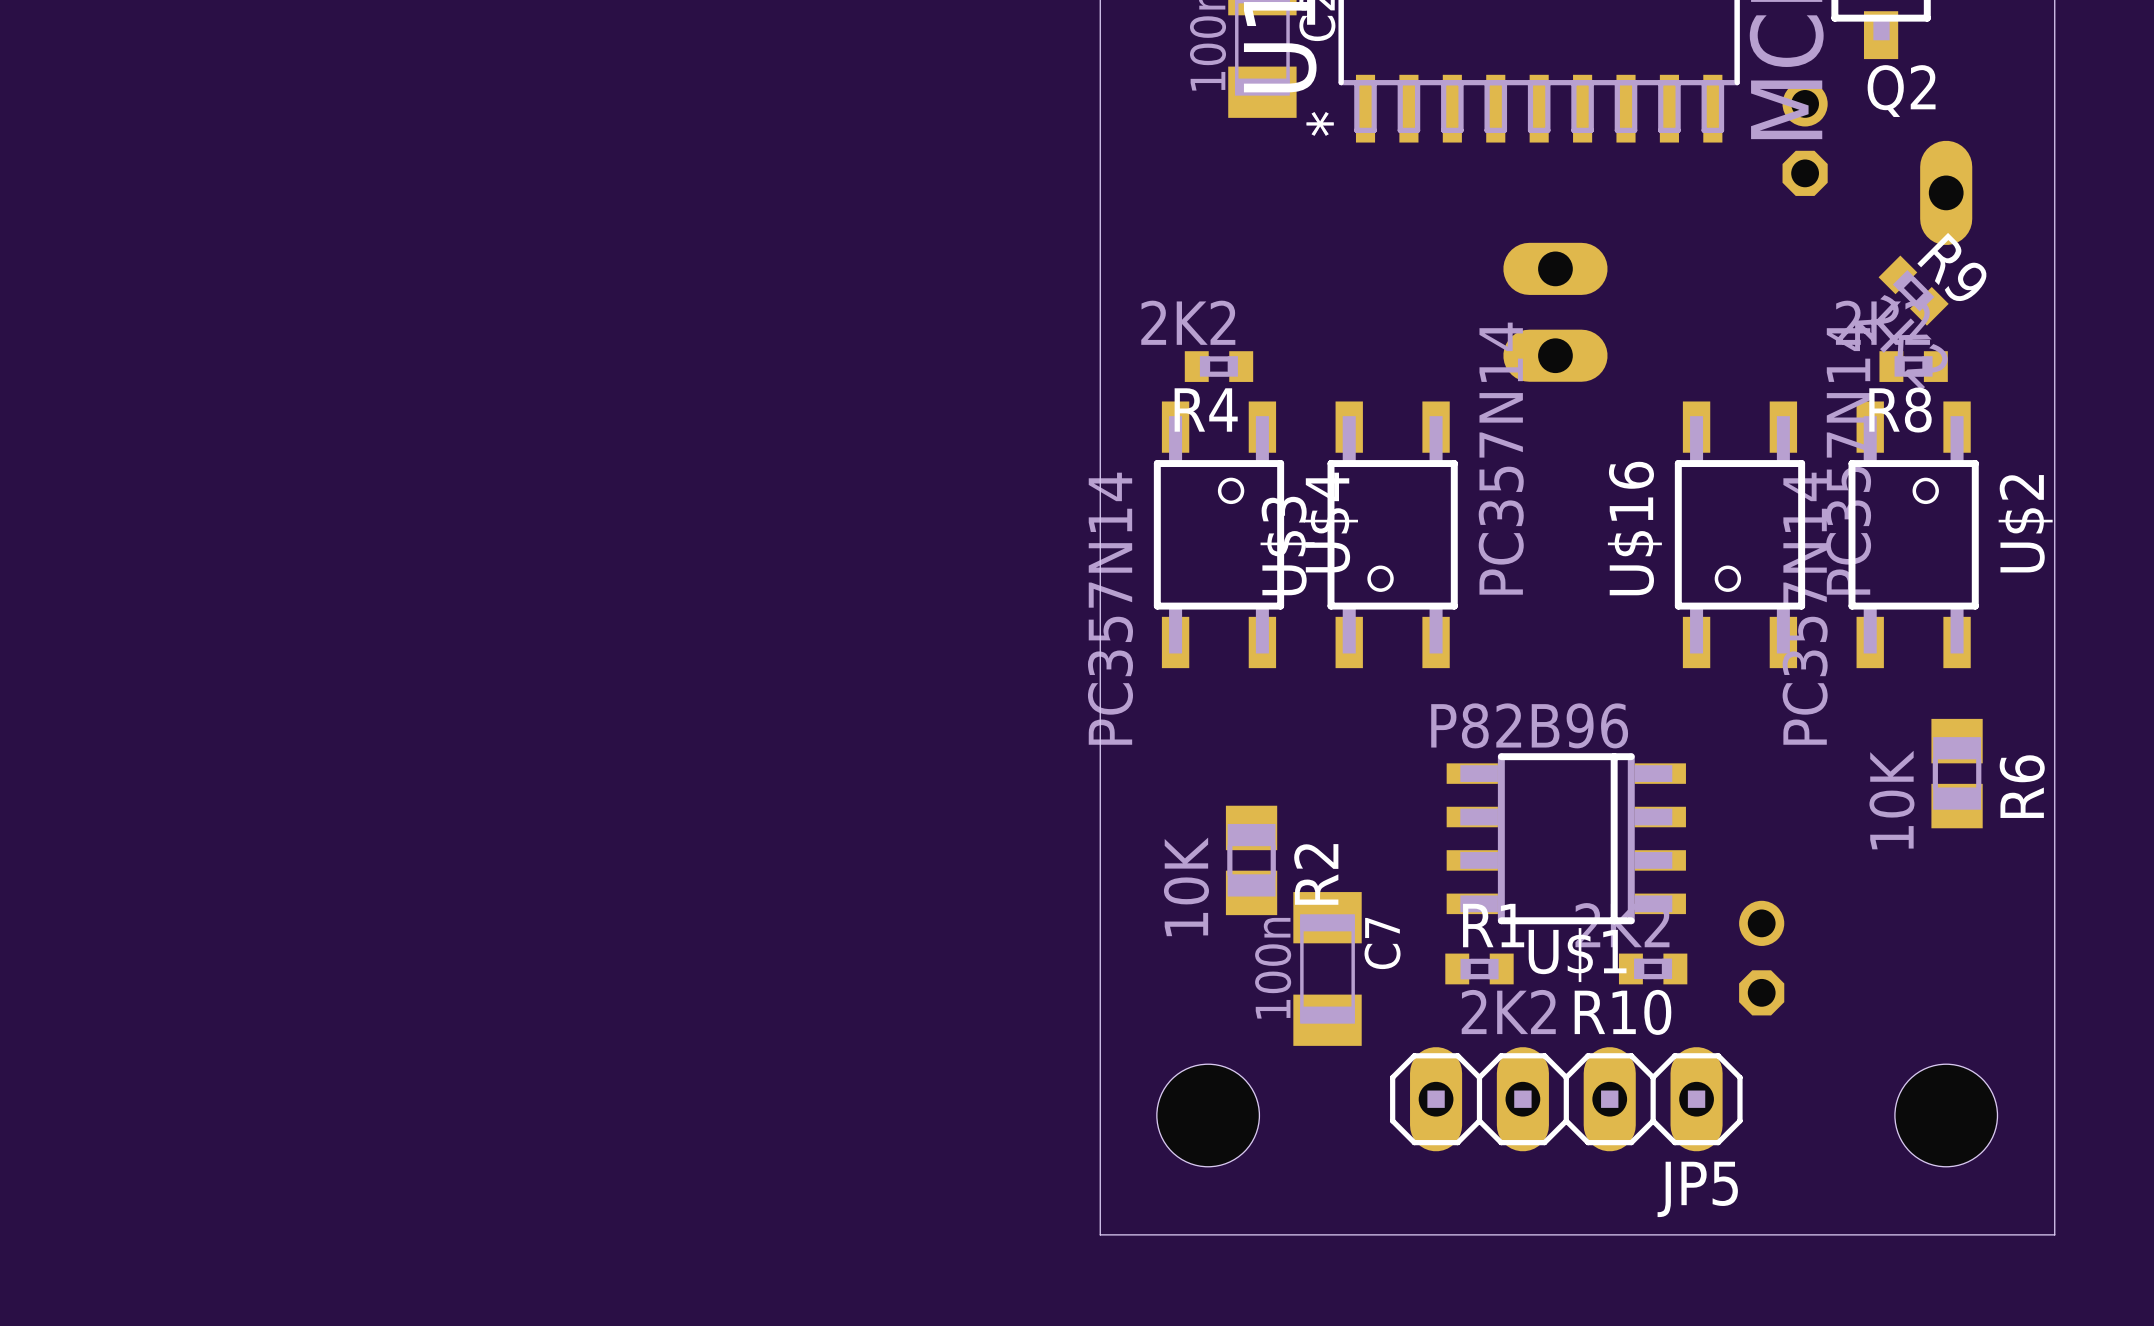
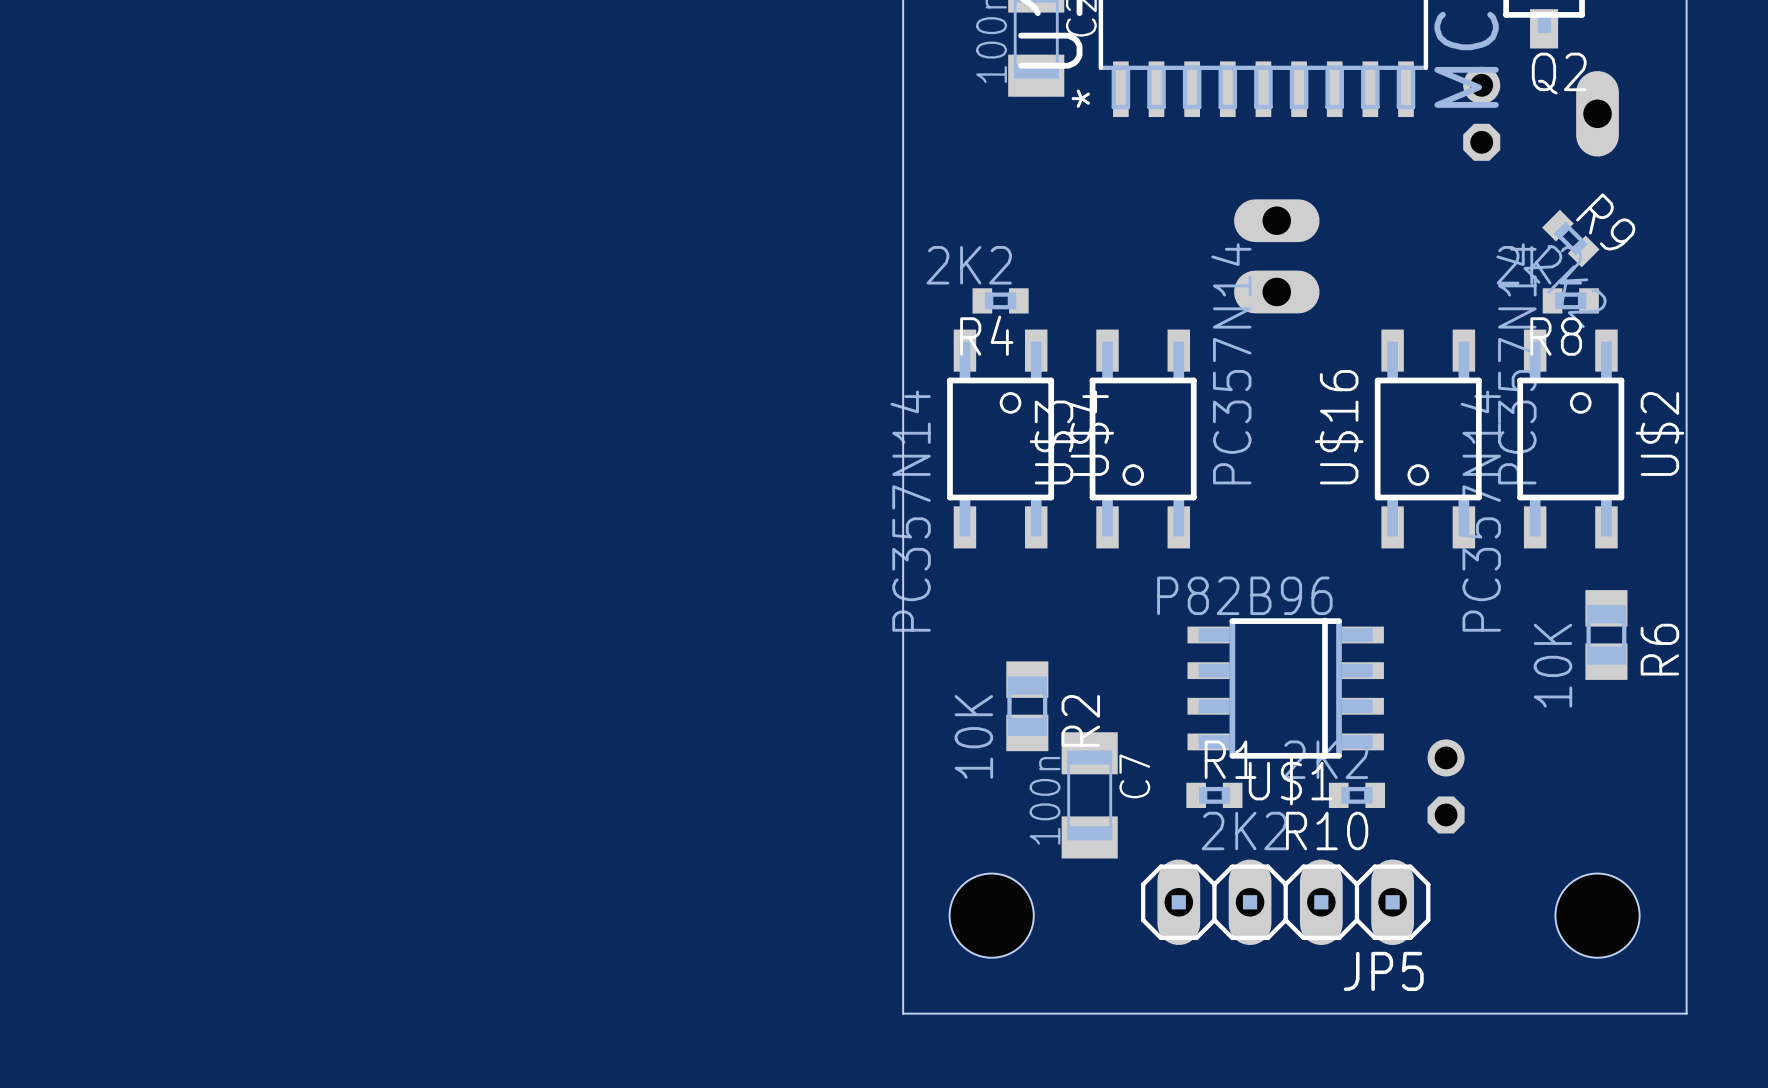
part position: (1946, 192) -> (1597, 113)

